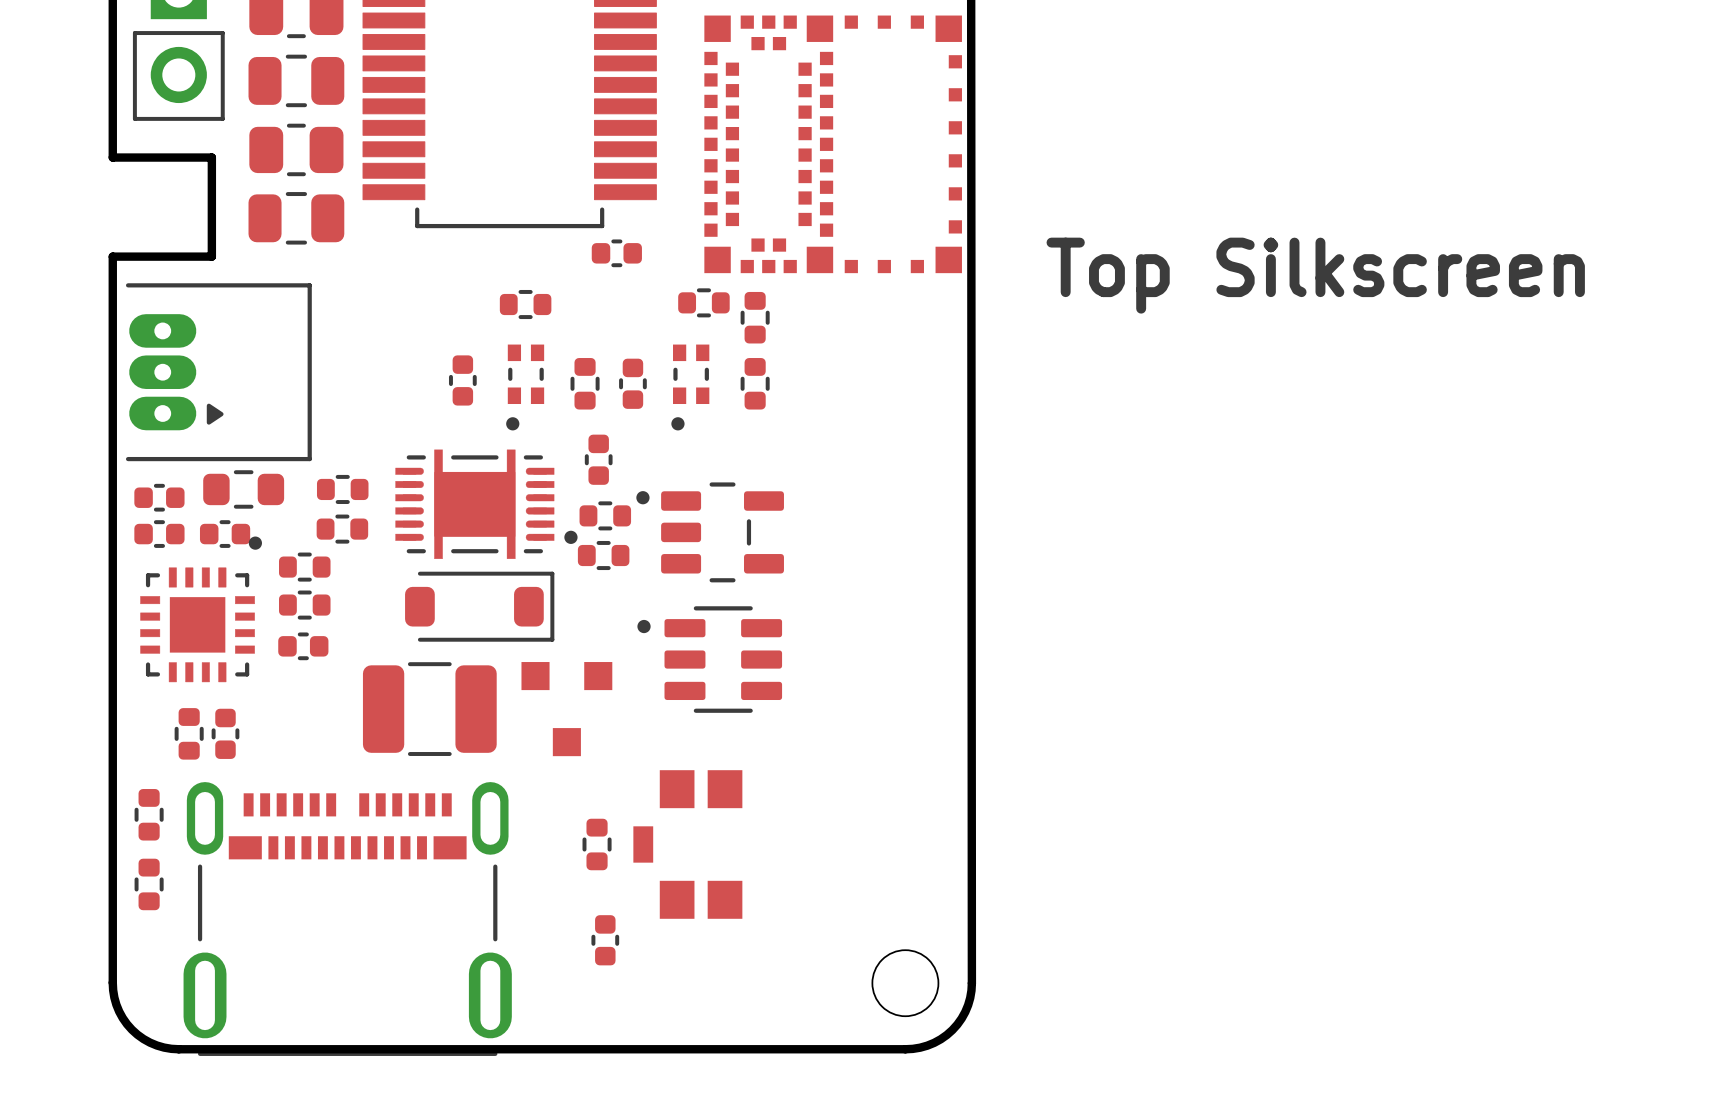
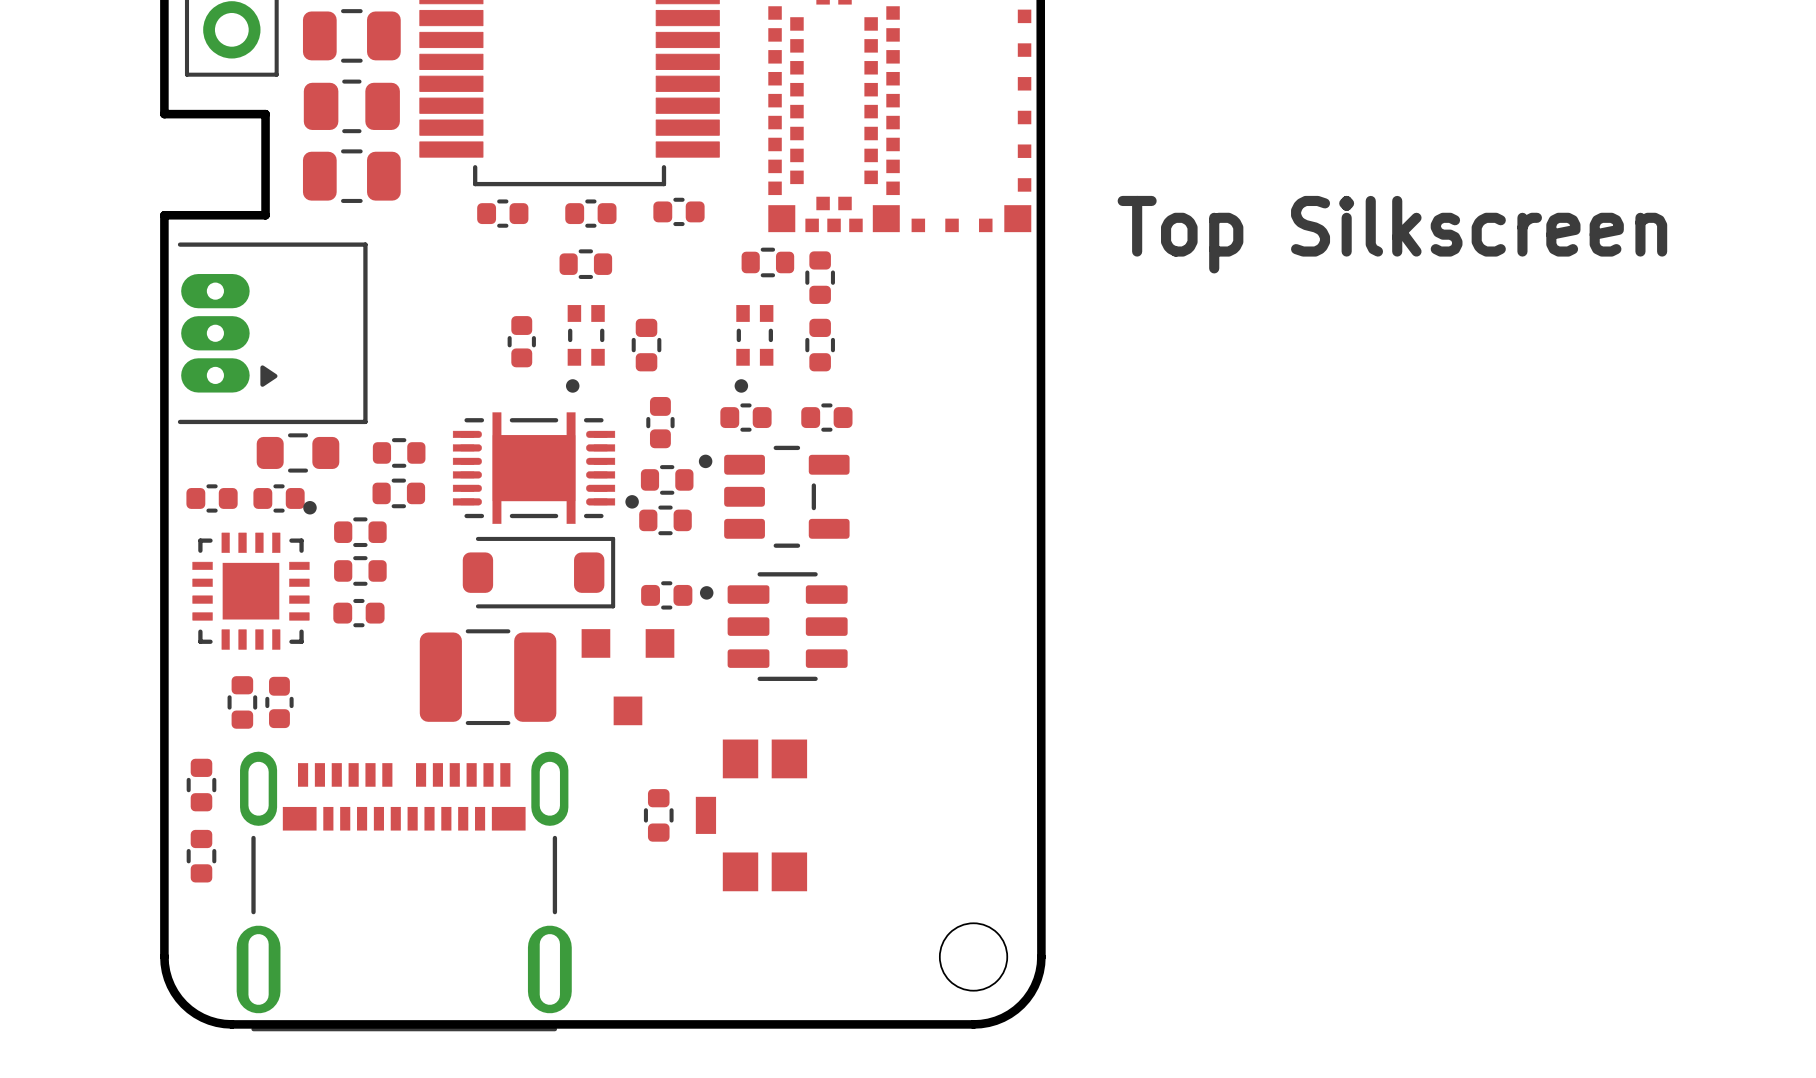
part: none -> (502, 213)
part: none -> (590, 213)
part: (632, 383) -> none
part: none -> (745, 417)
part: none -> (826, 417)
part: (159, 497) -> none
part: none -> (666, 595)
part: (605, 940) -> none

